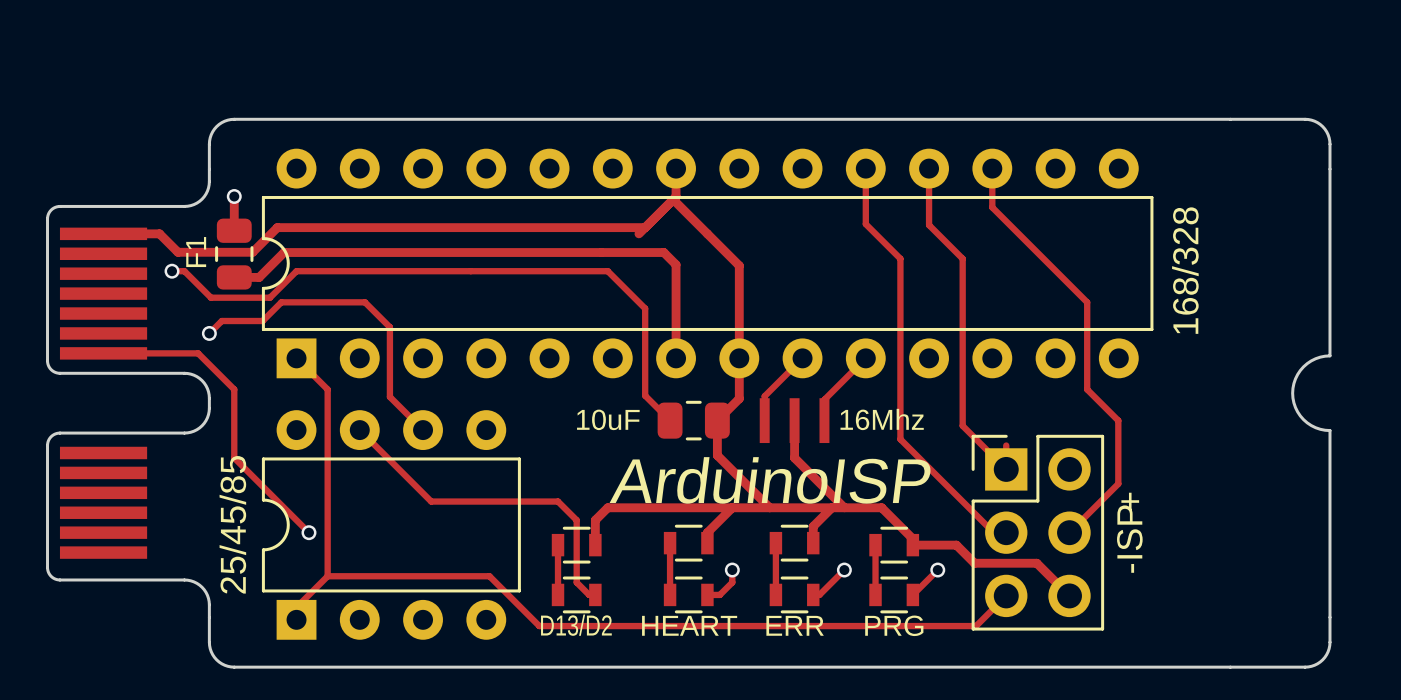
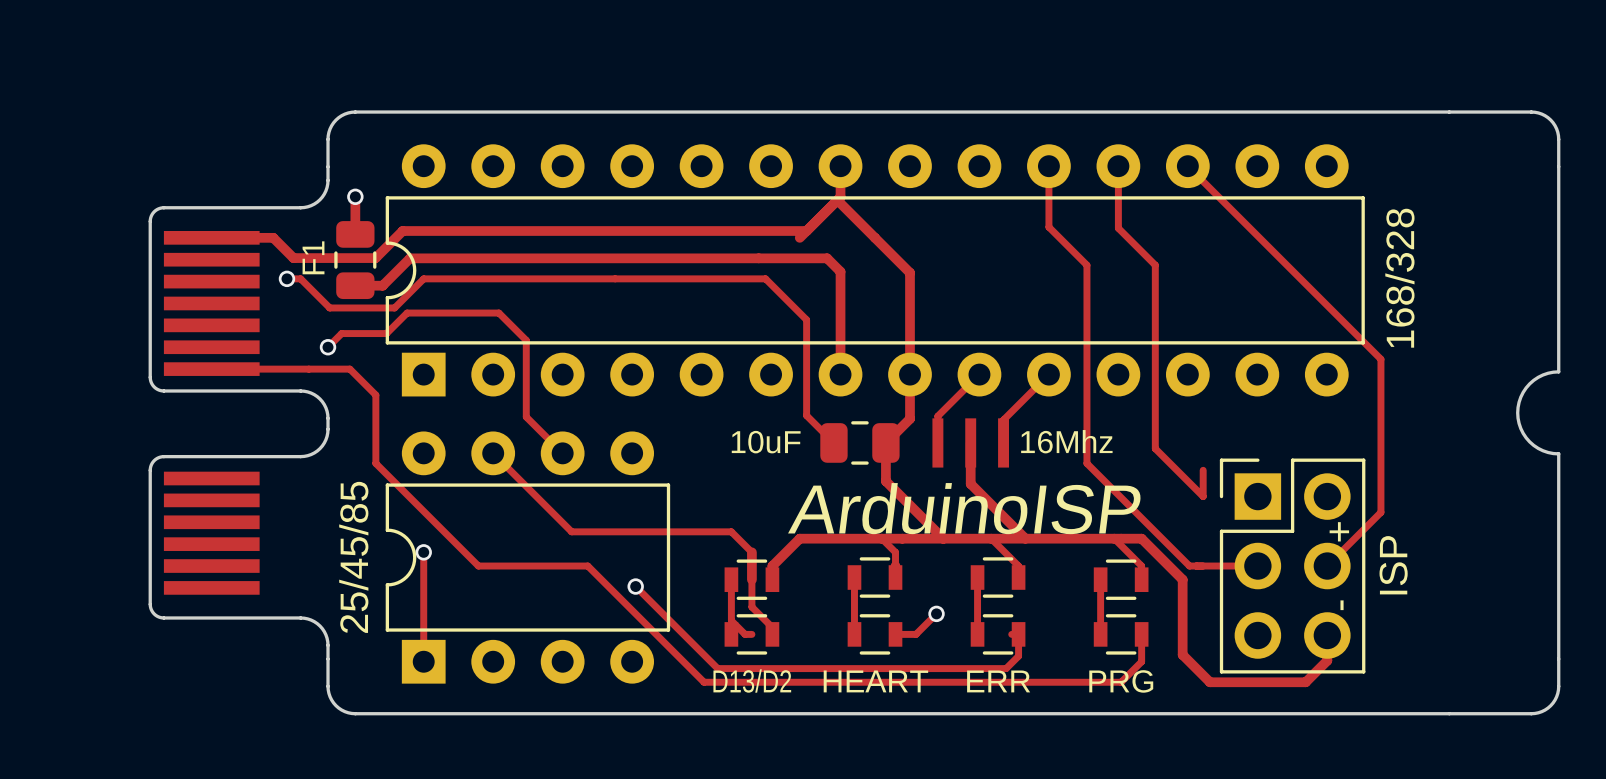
track: (992, 168) (992, 207) (1087, 302) (1087, 389) (1118, 420) (1118, 483) (1069, 532) -> (1187, 166) (1380, 359) (1380, 512) (1327, 566)
track: (198, 353) (234, 389) (234, 457) (308, 532) -> (315, 369) (349, 369) (375, 395) (375, 463) (478, 566) (587, 566) (635, 613)
track: (296, 358) (327, 389) (327, 576) -> none
text position: ArduinoISP (770, 480) -> ArduinoISP (964, 508)
track: (558, 501) (576, 520) (576, 545) -> (710, 531) (731, 531) (751, 552)
track: (638, 507) (607, 507) (595, 520) -> (799, 538) (772, 566) (772, 579)
track: none -> (881, 538) (895, 552) (895, 577) (895, 566)
track: (732, 507) (707, 532) (707, 543) -> none
track: none -> (991, 538) (1018, 566) (1018, 577)
track: (831, 507) (813, 526) (813, 543) -> none
track: (881, 507) (912, 538) (912, 545) (956, 545) (974, 563) (1036, 563) (1069, 595) -> (1066, 538) (1141, 538) (1182, 579) (1182, 654) (1210, 682) (1305, 682) (1327, 660) (1327, 635)
track: none -> (1114, 538) (1141, 566) (1141, 579)
via position: (308, 532) -> (423, 552)
track: none -> (1203, 566) (1257, 566)
part position: (1037, 532) -> (1292, 566)
track: (670, 543) (670, 594) -> (854, 577) (854, 634)
part position: (688, 543) -> (874, 577)
track: (775, 543) (775, 594) -> (977, 577) (977, 634)
part position: (794, 543) -> (998, 577)
track: (558, 545) (558, 594) -> none
part position: (576, 545) -> (751, 579)
track: none -> (751, 579) (751, 607) (772, 627) (772, 634)
track: (875, 545) (875, 594) -> none
part position: (894, 545) -> (1121, 579)
via: none -> (635, 586)
track: (732, 570) (732, 582) (719, 594) (707, 594) -> none
via position: (732, 570) -> (936, 613)
track: (844, 570) (819, 594) (813, 594) -> none
via: (844, 570) -> none
track: (937, 570) (912, 594) -> (1100, 579) (1100, 634)
via: (937, 570) -> none
track: (327, 576) (296, 607) -> (423, 552) (423, 648)
track: (327, 576) (489, 576) -> none
track: none -> (936, 613) (916, 634) (895, 634)
part position: (576, 594) -> (751, 634)
part position: (688, 594) -> (874, 634)
part position: (794, 594) -> (998, 634)
part position: (894, 594) -> (1121, 634)
track: none -> (1141, 634) (1141, 661) (1121, 682) (704, 682) (690, 668)
track: (1006, 595) (976, 626) (826, 626) -> (1011, 634) (1018, 634) (1018, 656) (1006, 668)
part value position: D13/D2 (576, 625) -> D13/D2 (752, 681)
part value position: HEART (689, 625) -> HEART (875, 681)
part value position: ERR (795, 625) -> ERR (998, 681)
part value position: PRG (894, 625) -> PRG (1121, 681)
track: (539, 626) (564, 626) -> (635, 586) (717, 668)

